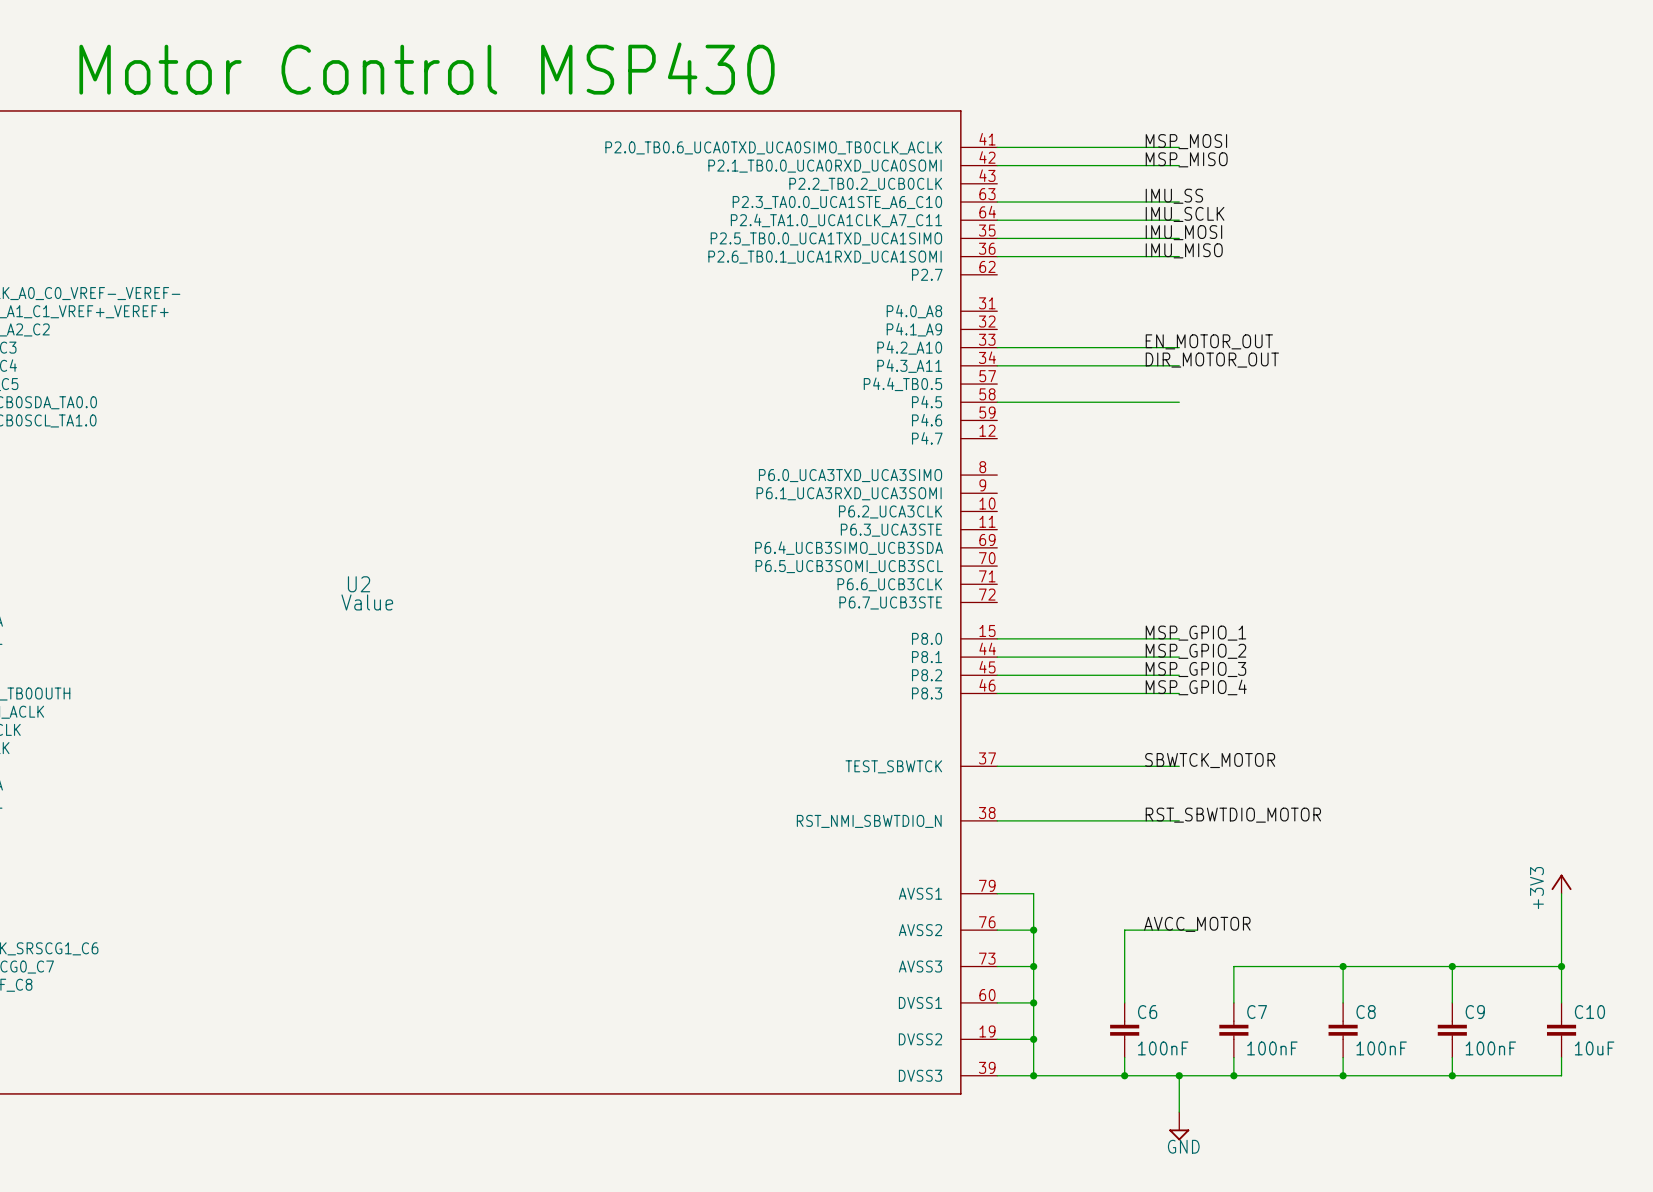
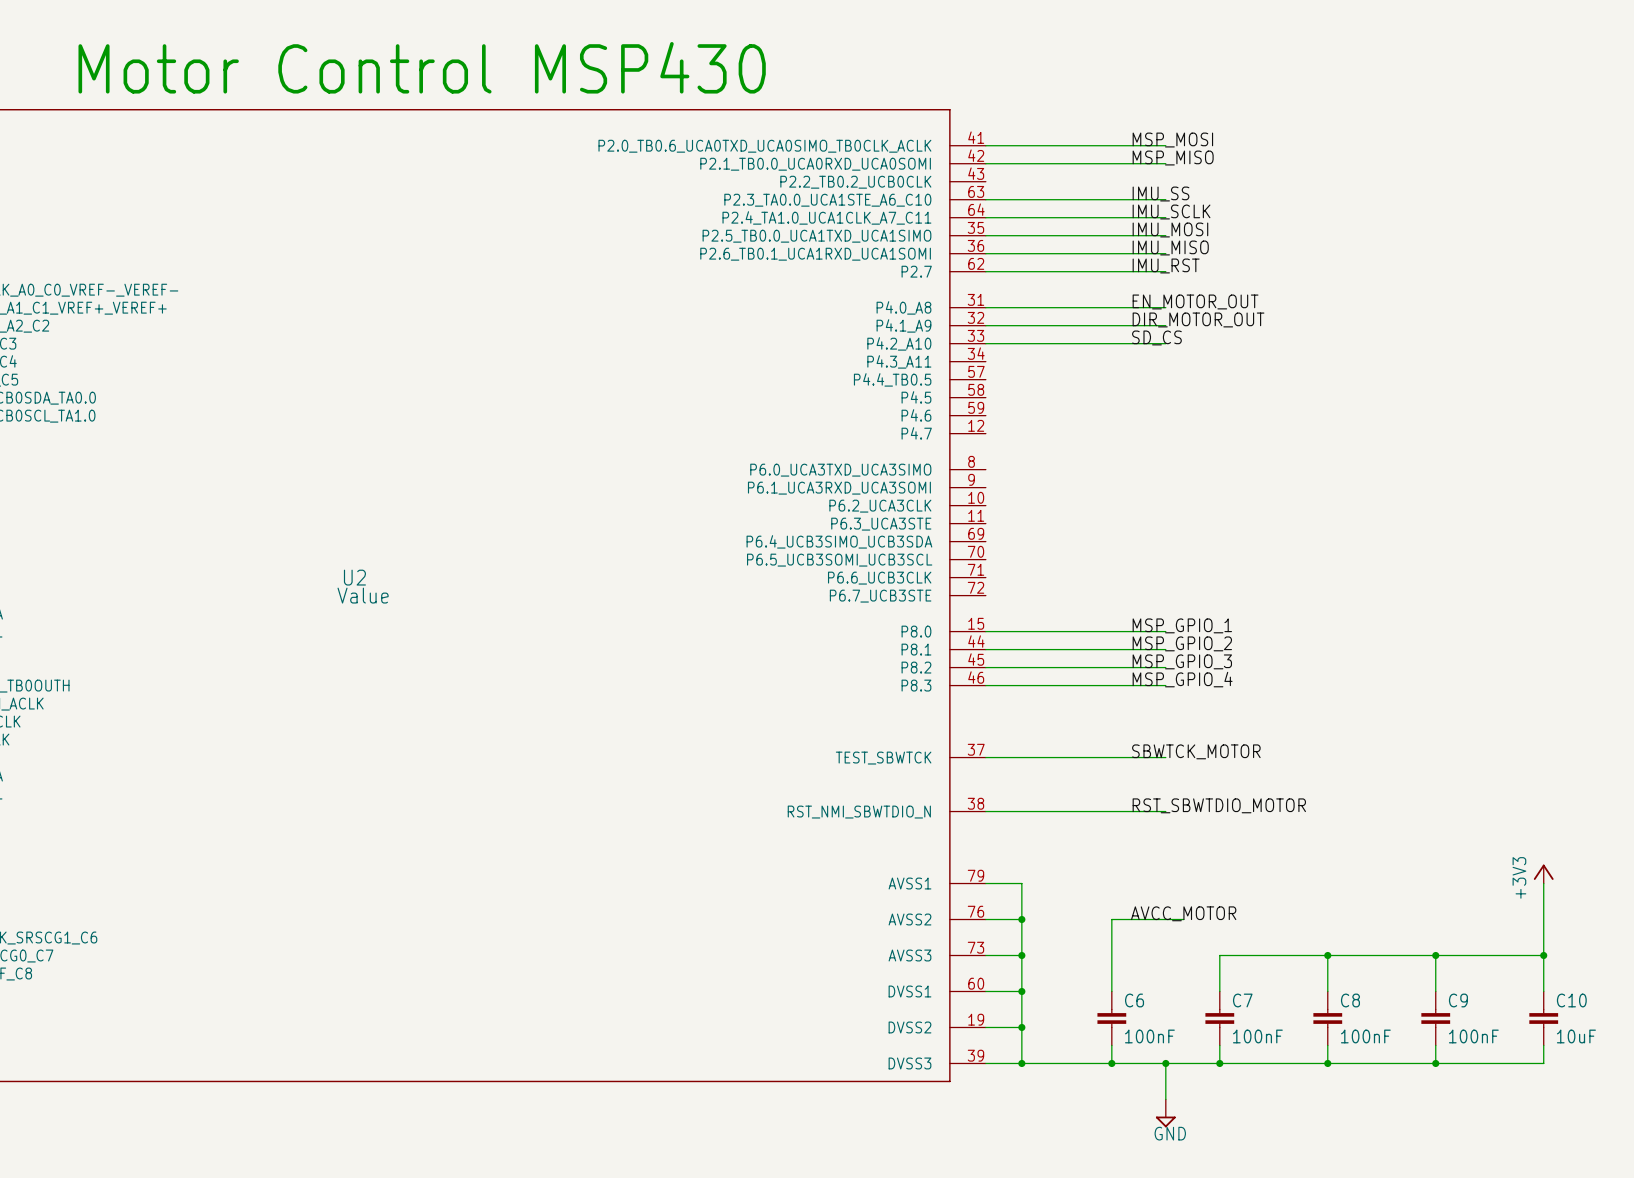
label: none -> IMU_RST (1166, 265)
wire: none -> (985, 271) (1165, 271)
label: none -> EN_MOTOR_OUT (1195, 301)
label: EN_MOTOR_OUT (1209, 341) -> SD_CS (1156, 337)
label position: DIR_MOTOR_OUT (1212, 360) -> DIR_MOTOR_OUT (1198, 319)
wire: (997, 365) (1179, 365) -> (985, 325) (1165, 325)
wire: (997, 402) (1179, 402) -> (985, 307) (1165, 307)

